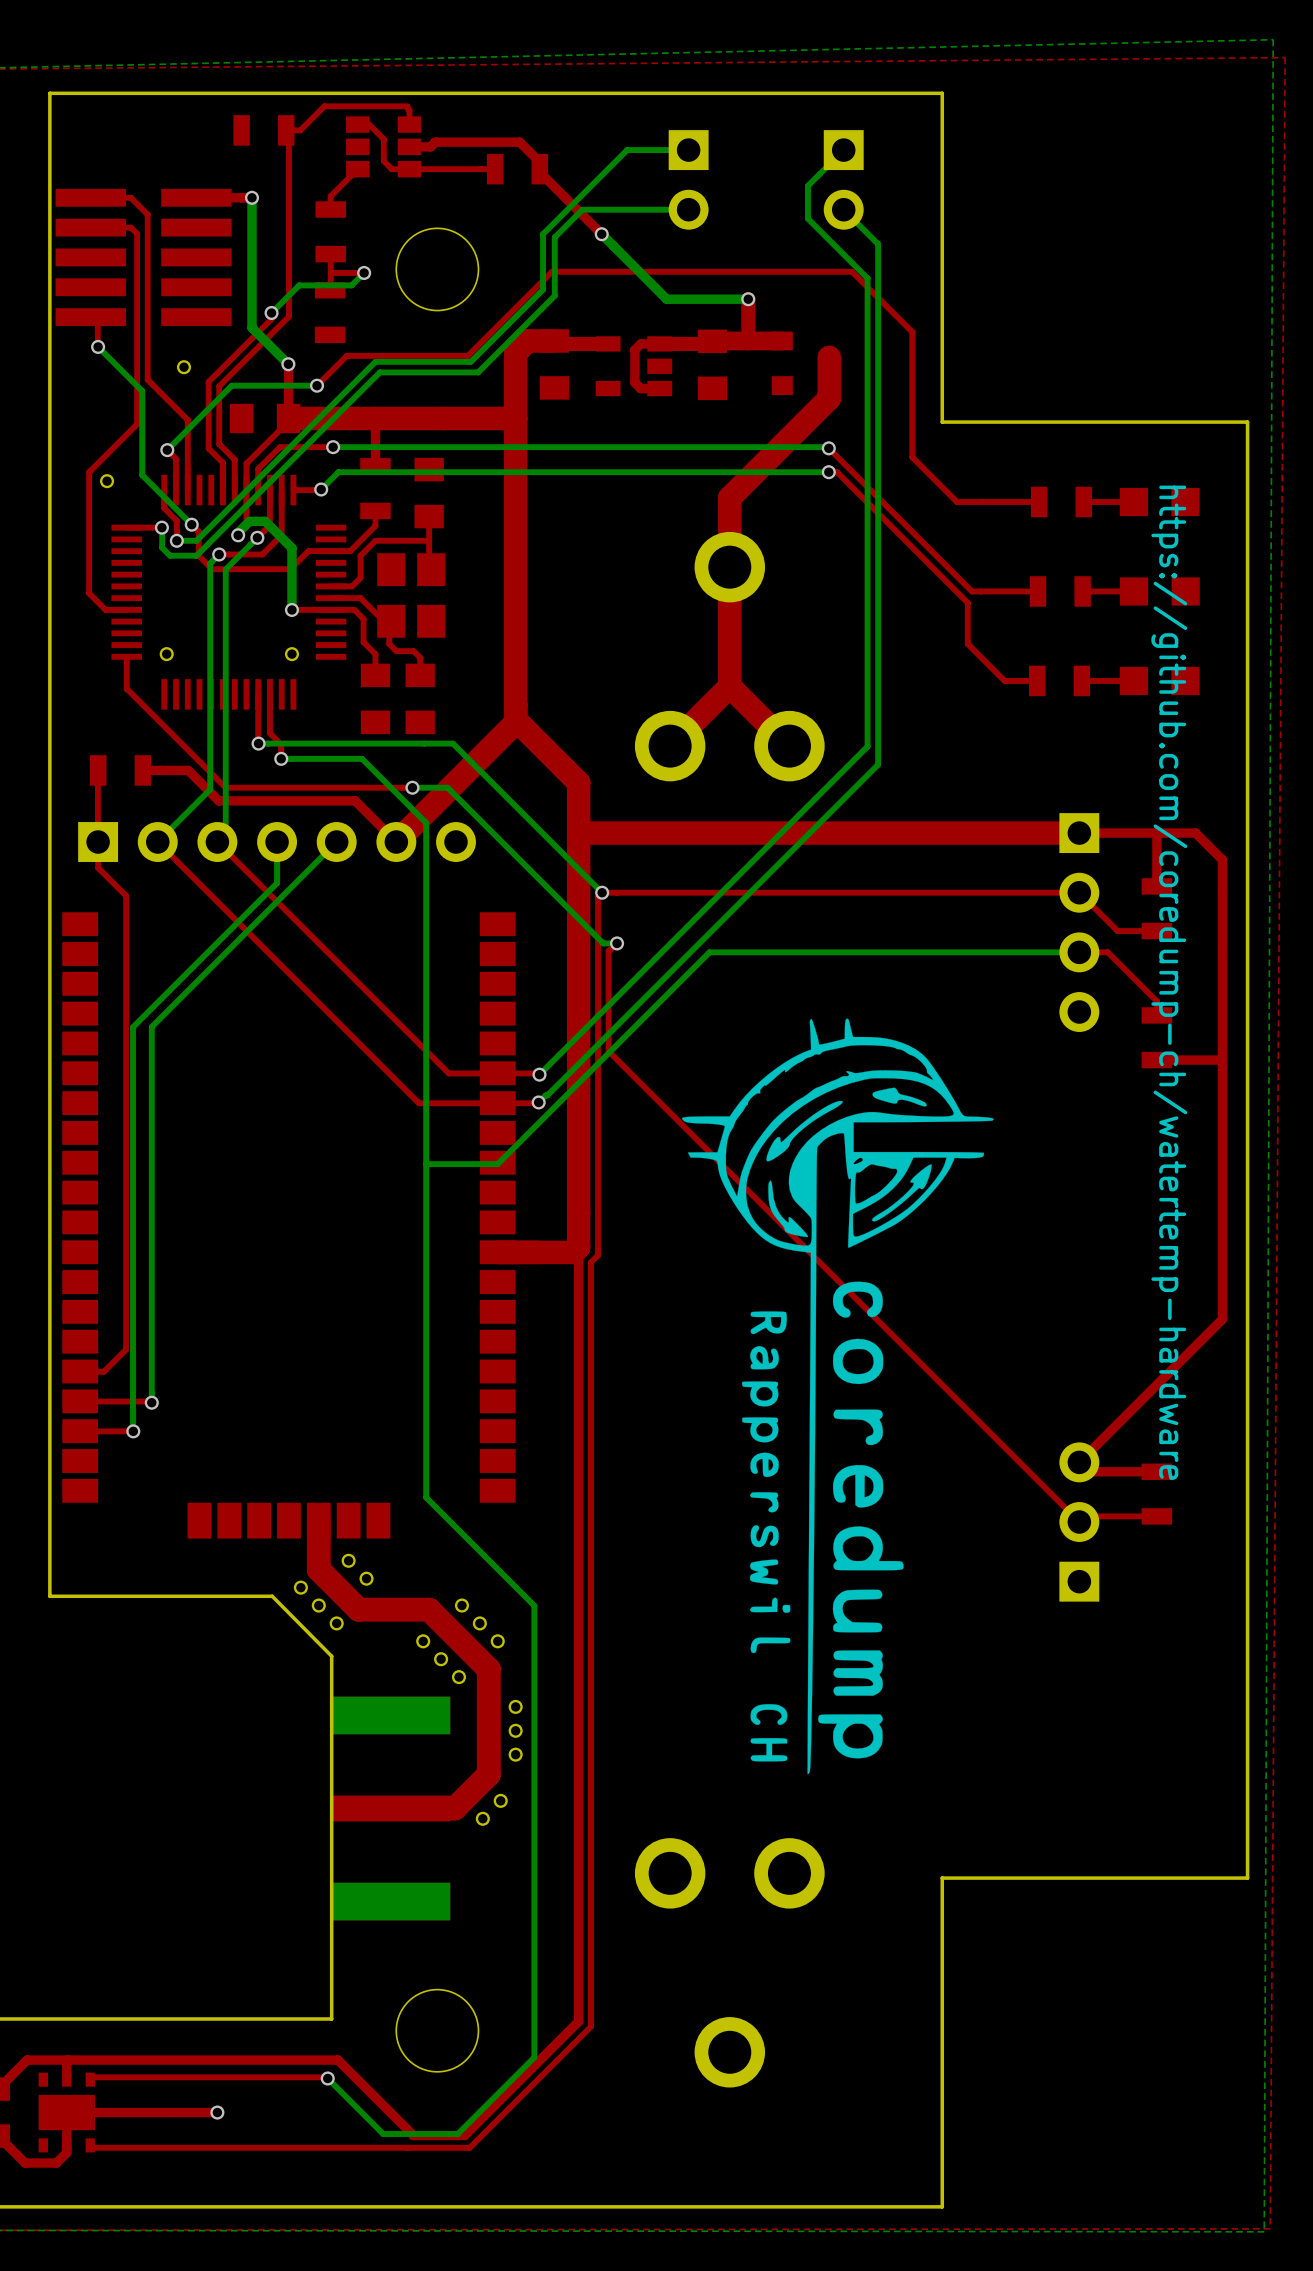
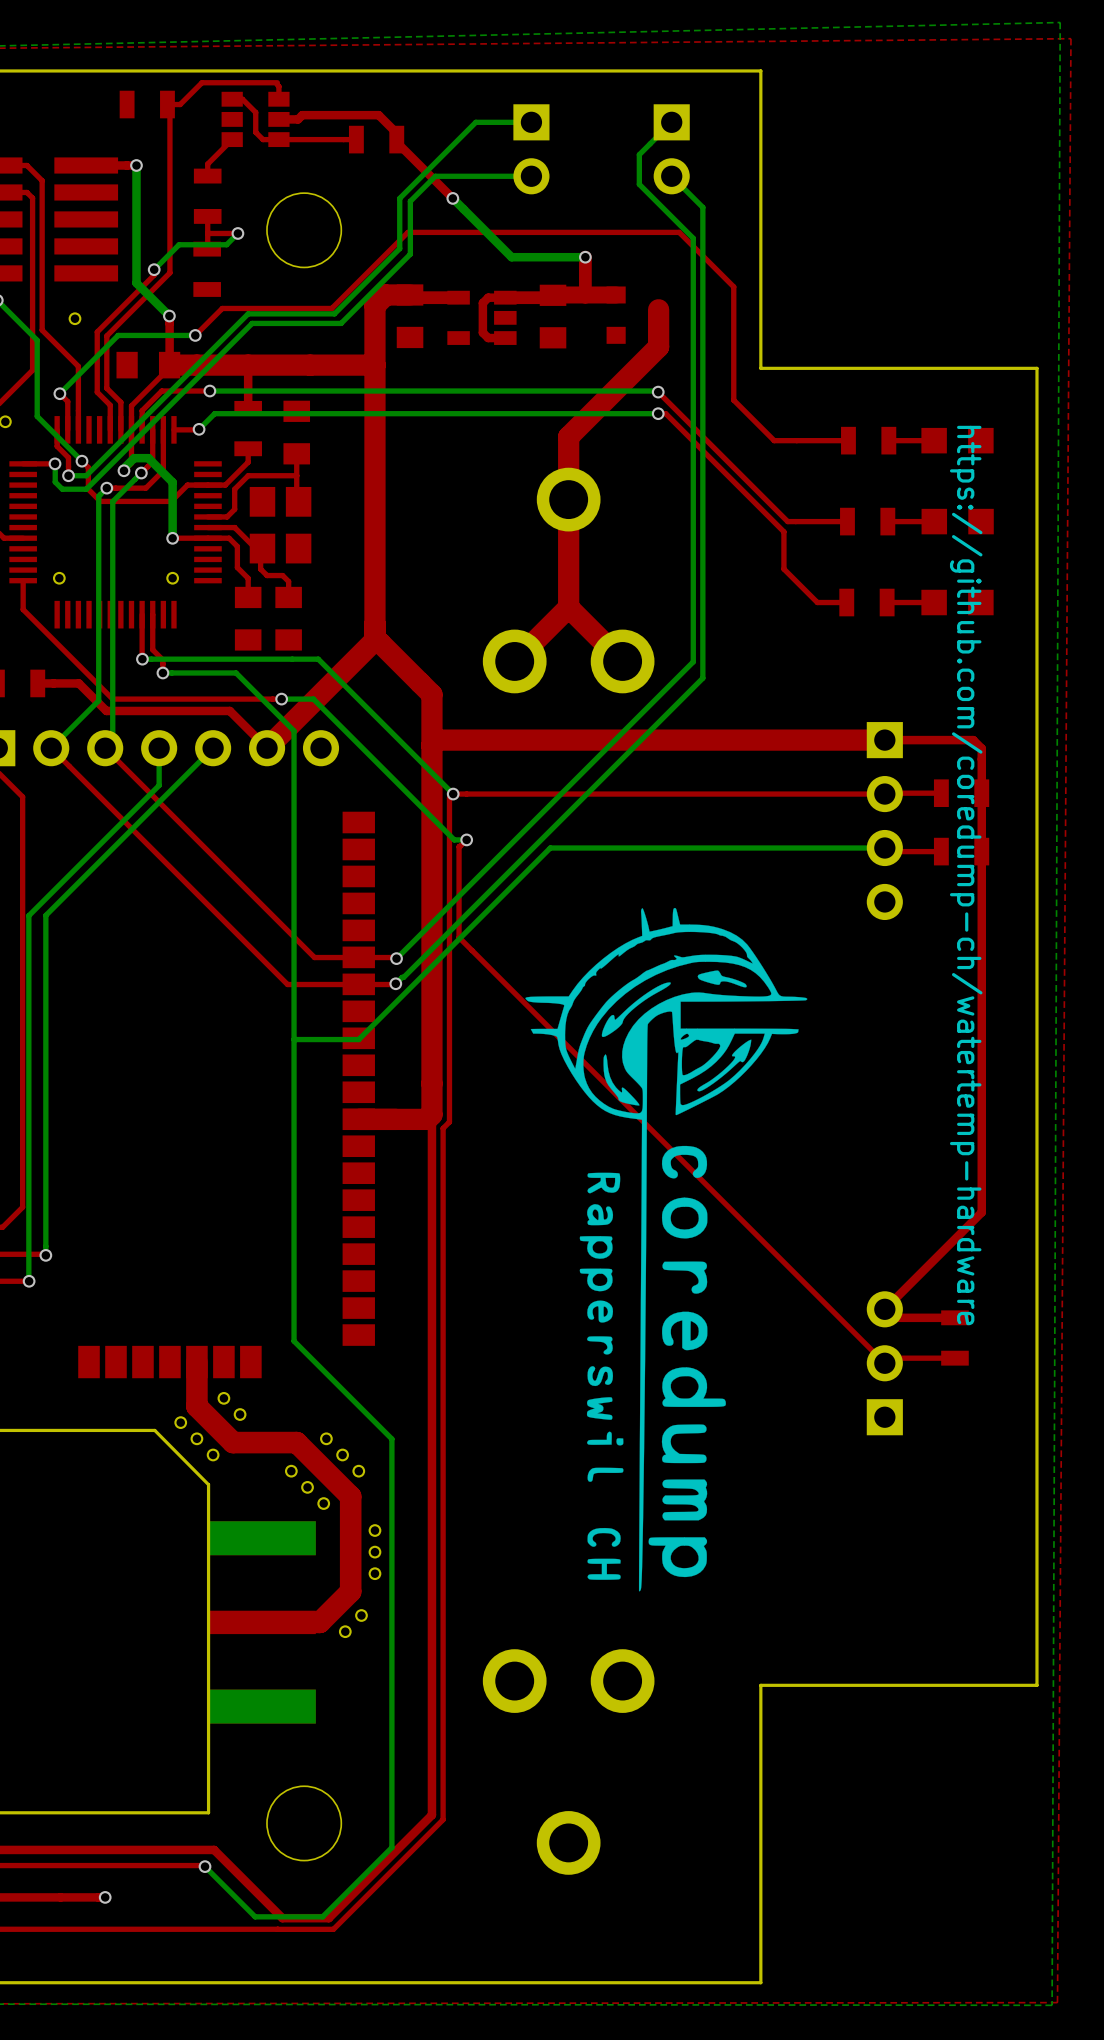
top track: (1156, 833) (1156, 886) -> none
top track: (1177, 833) (1195, 833) (1222, 859) (1222, 1319) (1186, 1355) -> (973, 740) (981, 748) (981, 1212)
top track: (1079, 892) (1117, 931) (1156, 931) -> (884, 794) (934, 793)
part rotation: 0° (1156, 908) -> 90° clockwise (961, 793)
top track: (1079, 952) (1107, 952) (1156, 1001) (1156, 1015) -> (884, 848) (888, 851) (934, 851)
part rotation: 0° (1156, 1037) -> 90° clockwise (961, 851)
part position: (1156, 1037) -> (961, 851)
top track: (1222, 1060) (1156, 1060) -> none

